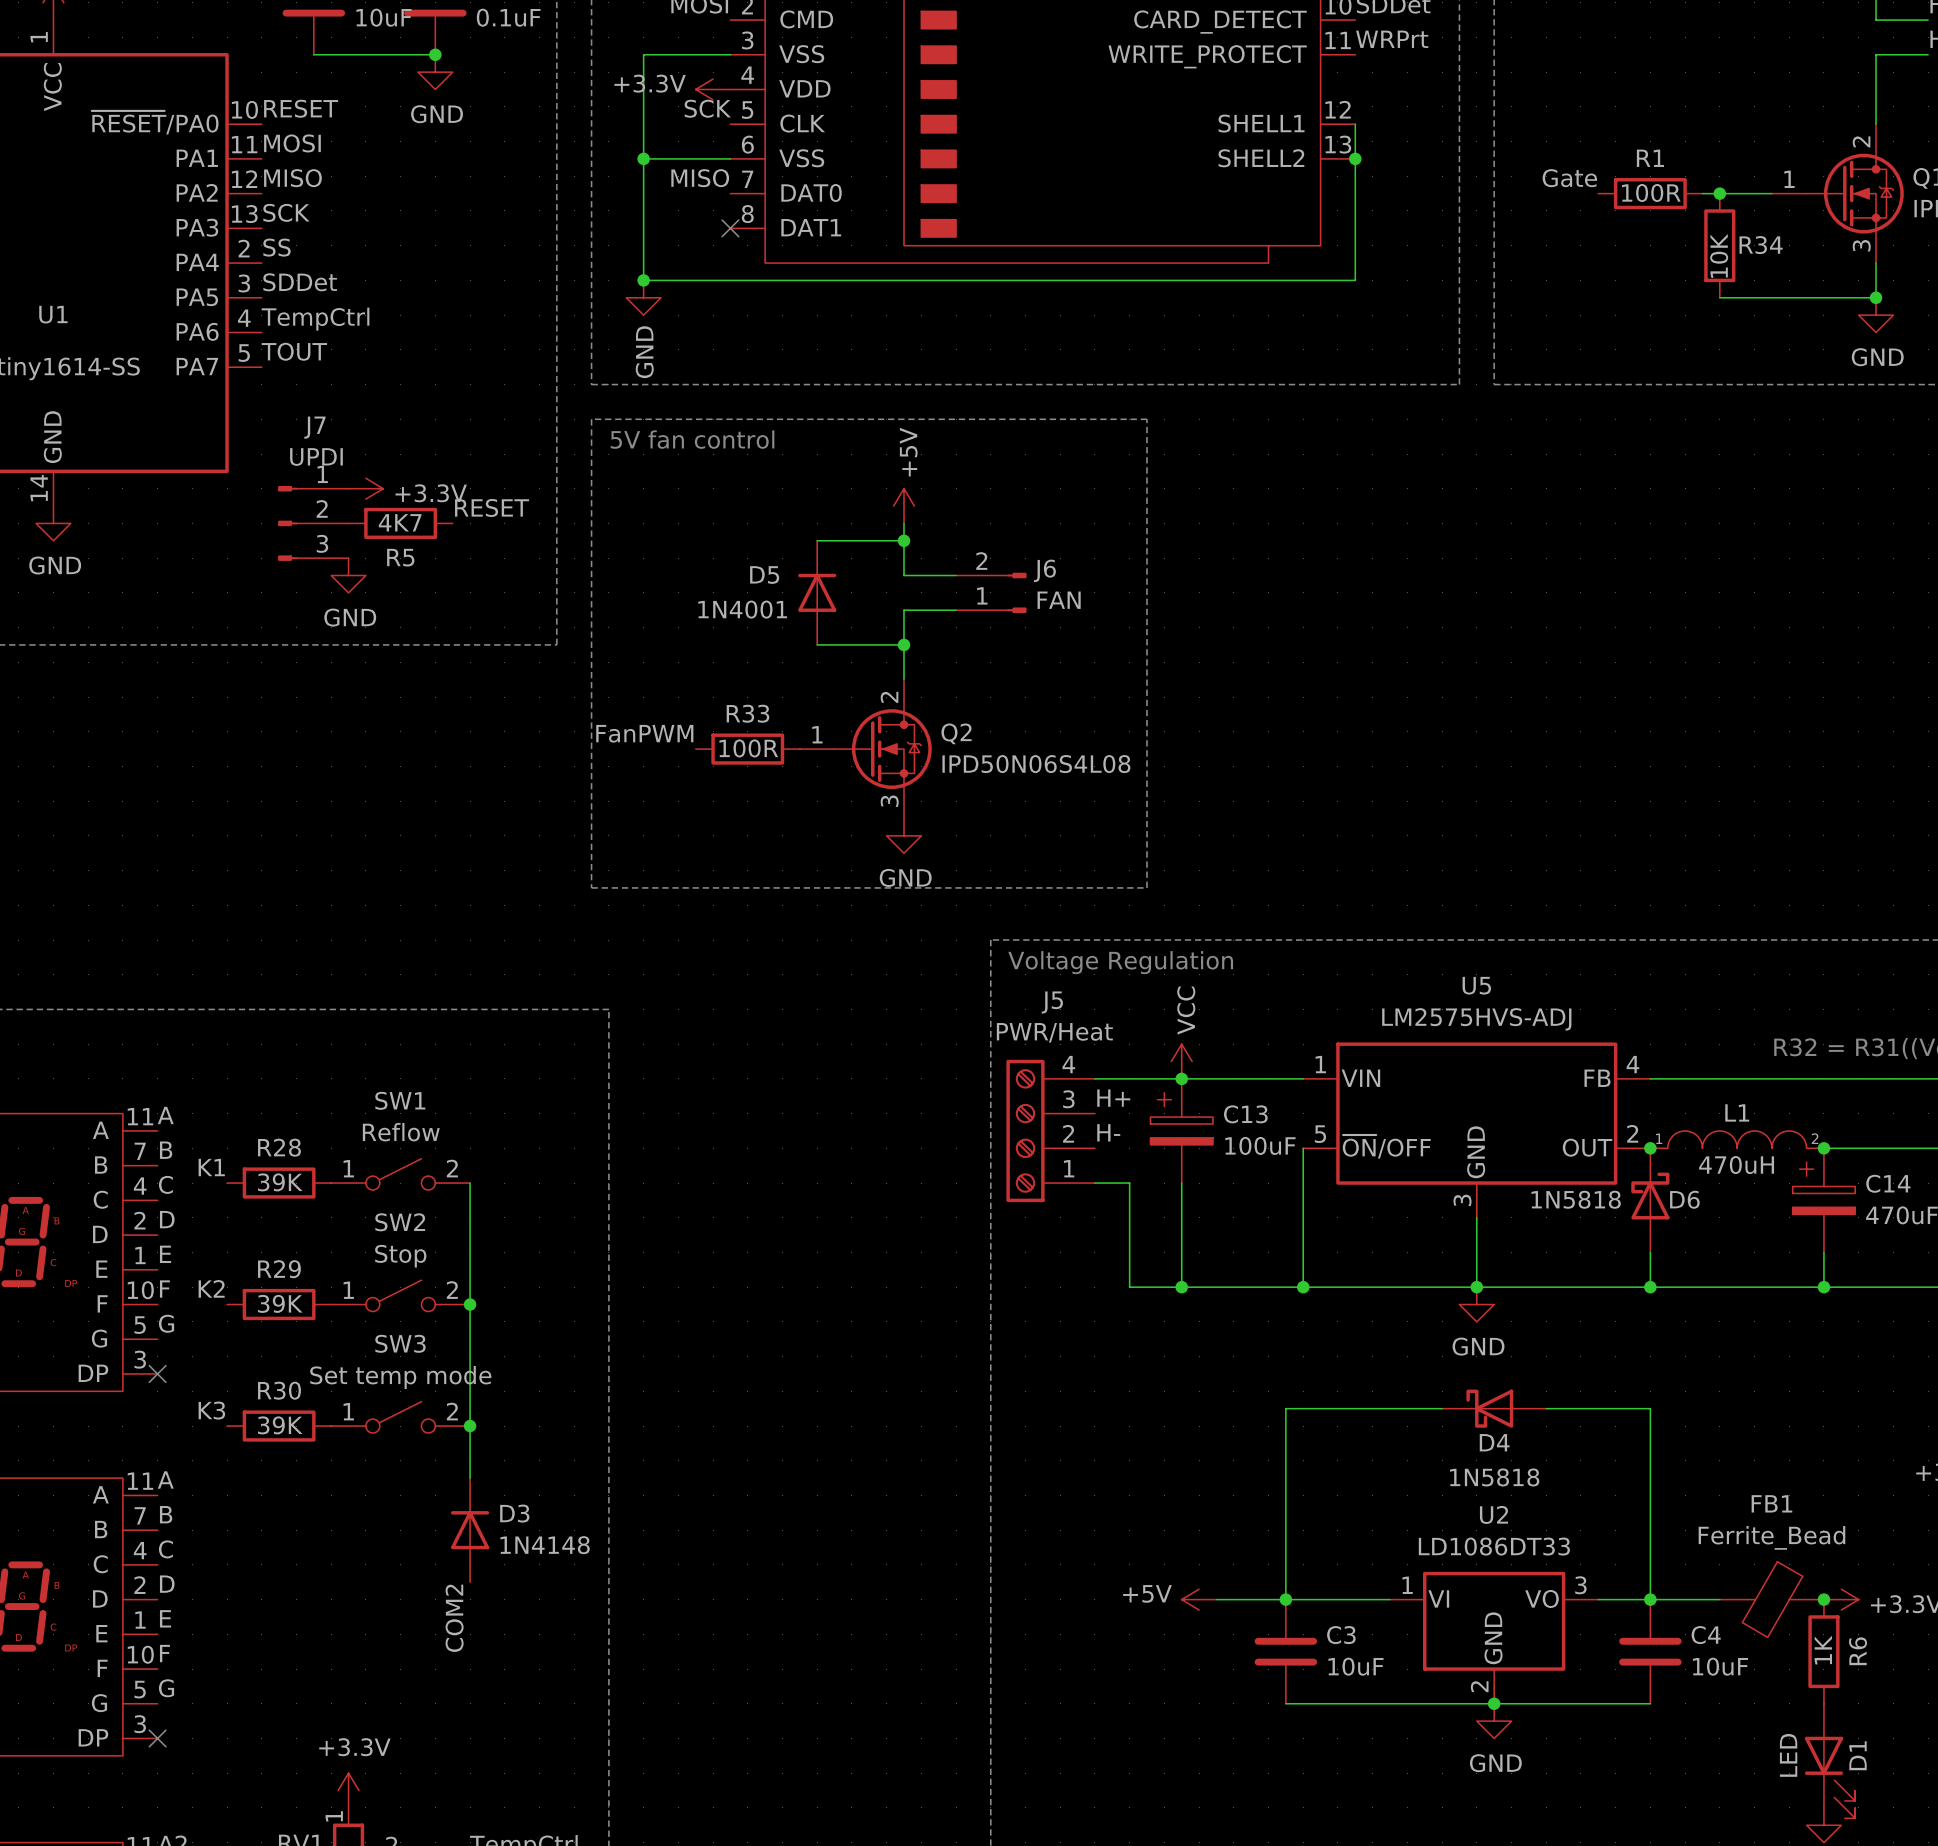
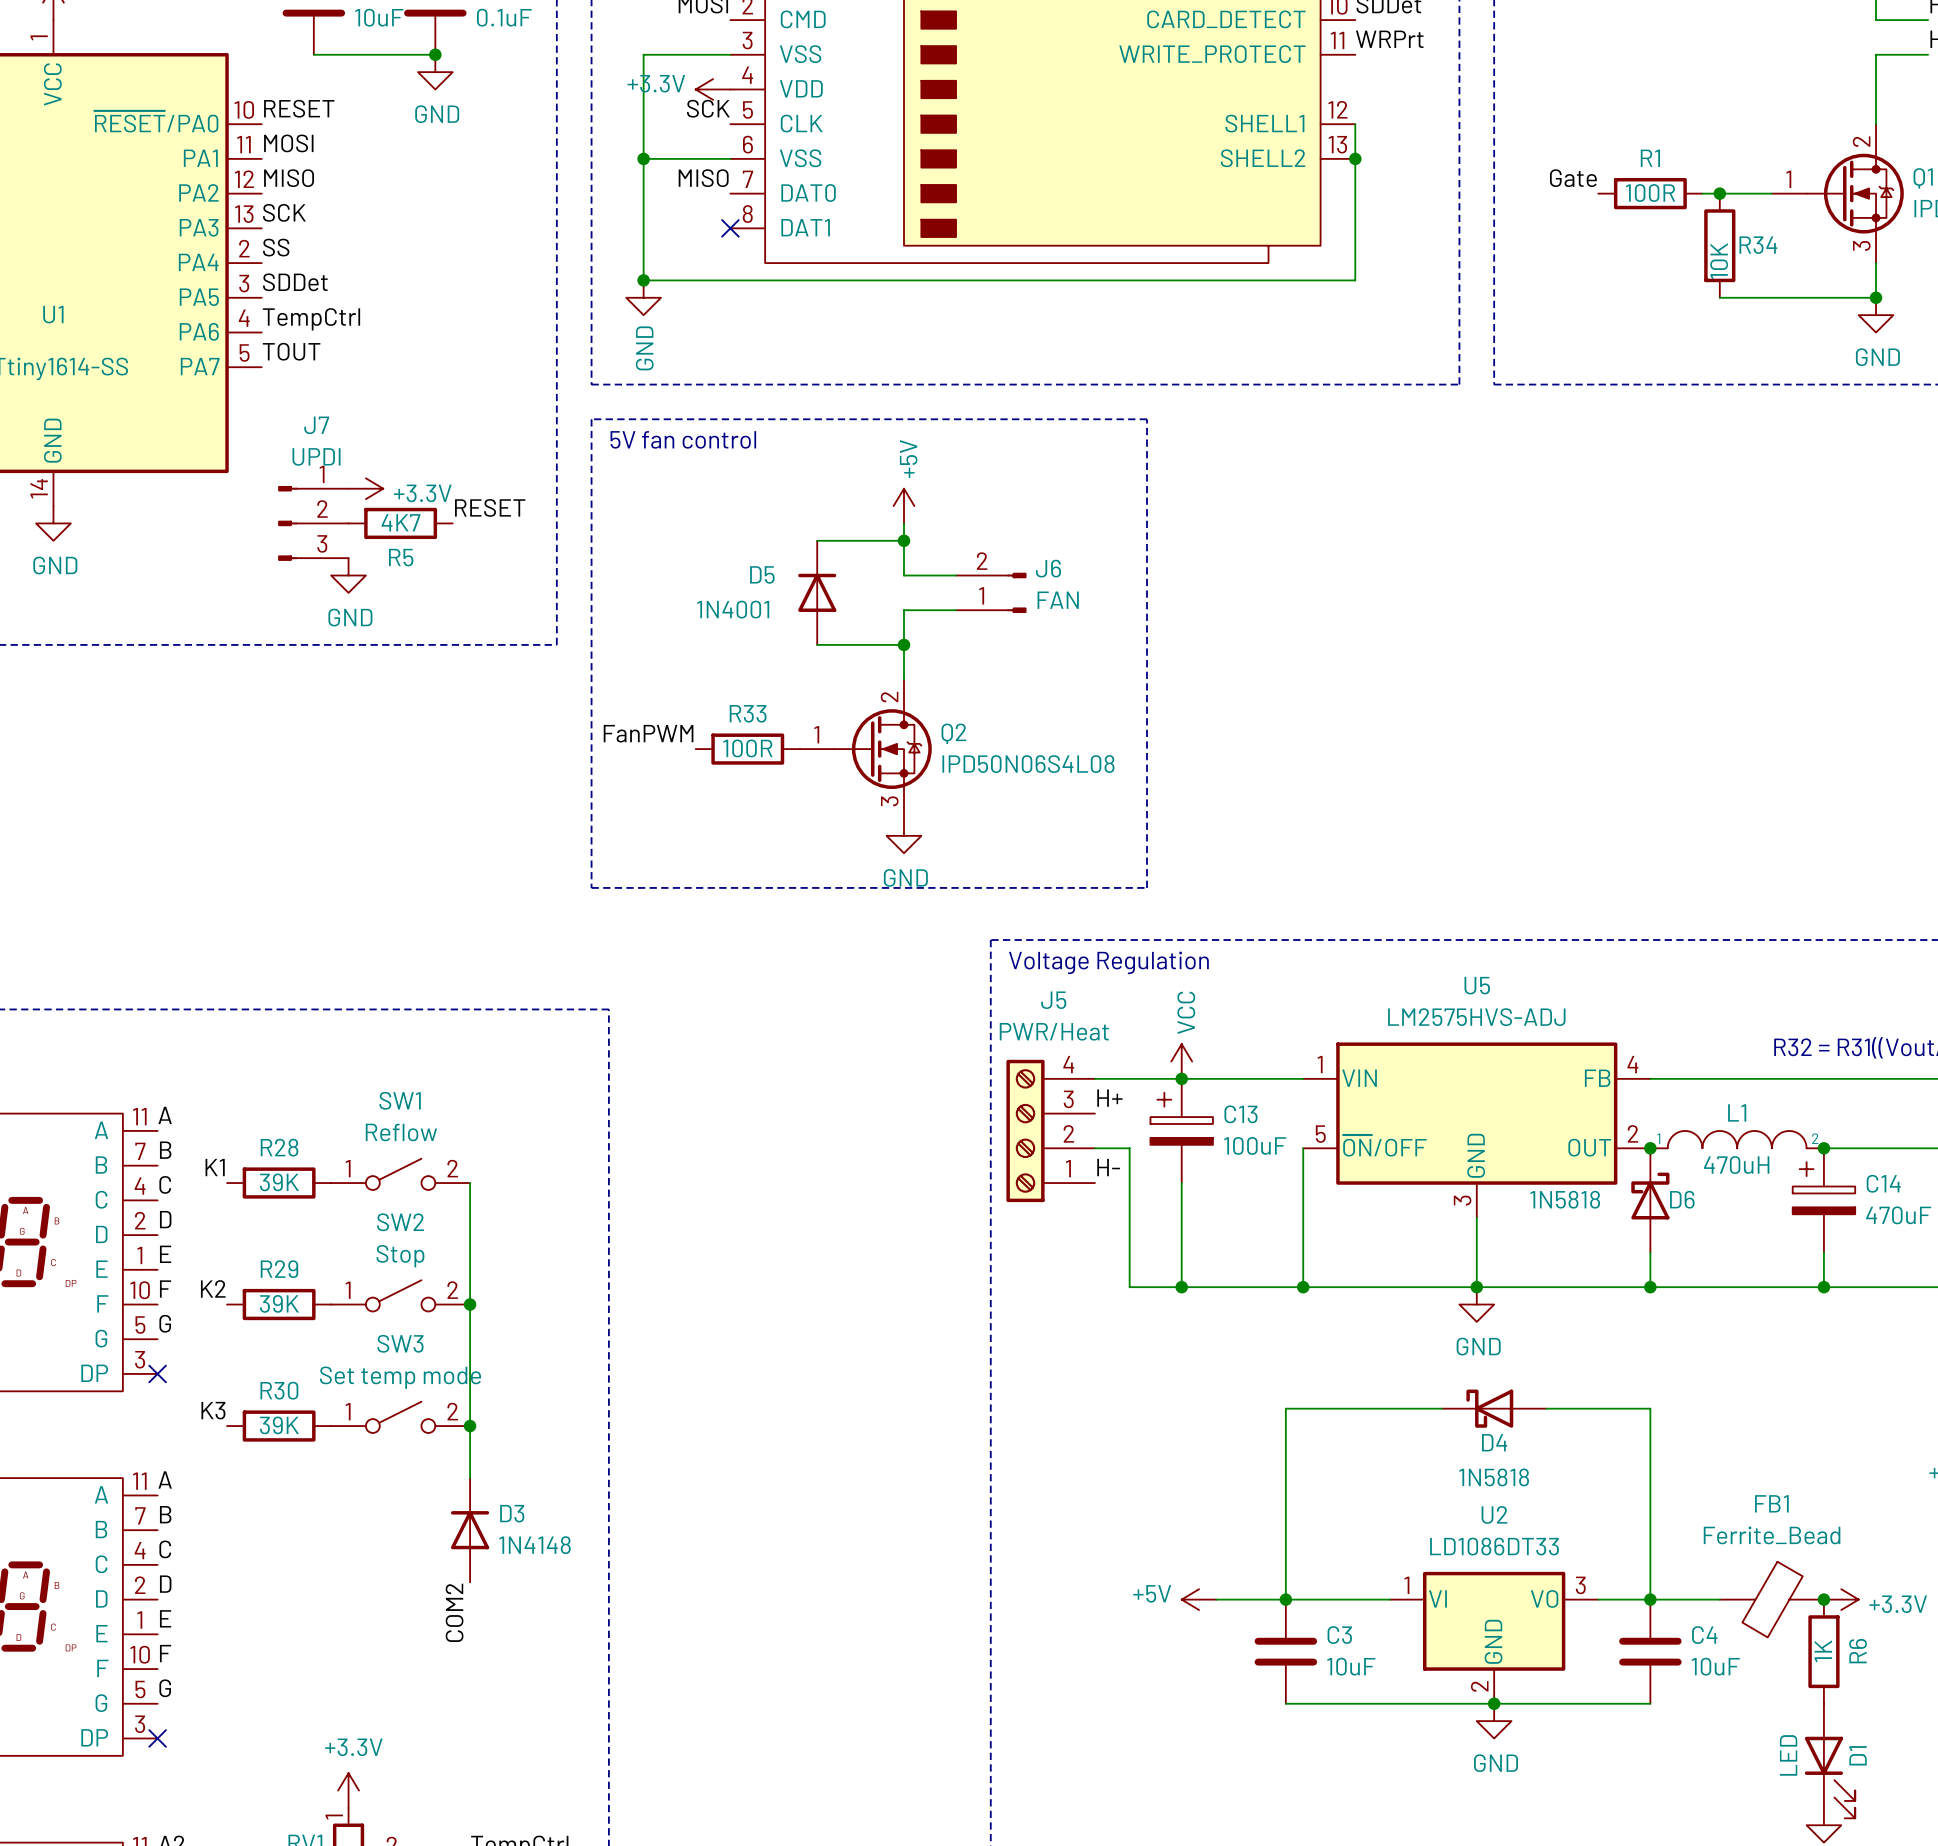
label position: H- (1108, 1132) -> H- (1108, 1167)
wire: (1094, 1183) (1129, 1183) -> (1094, 1148) (1129, 1148) (1129, 1183)

